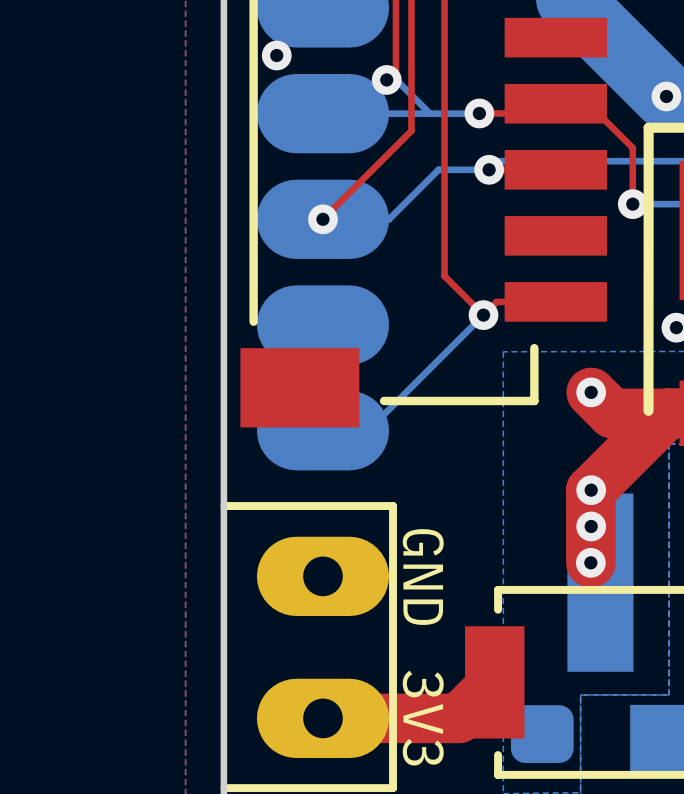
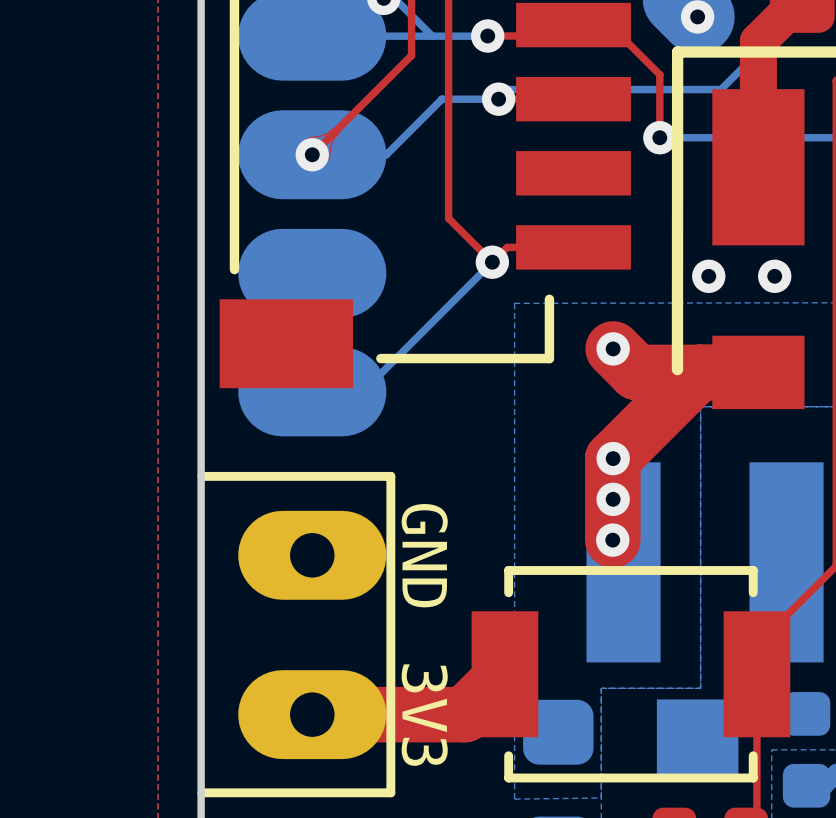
top zone outline: none -> (332, 128) (325, 134) (306, 139) (306, 160) (328, 160) (332, 141) (338, 134) (332, 128)

